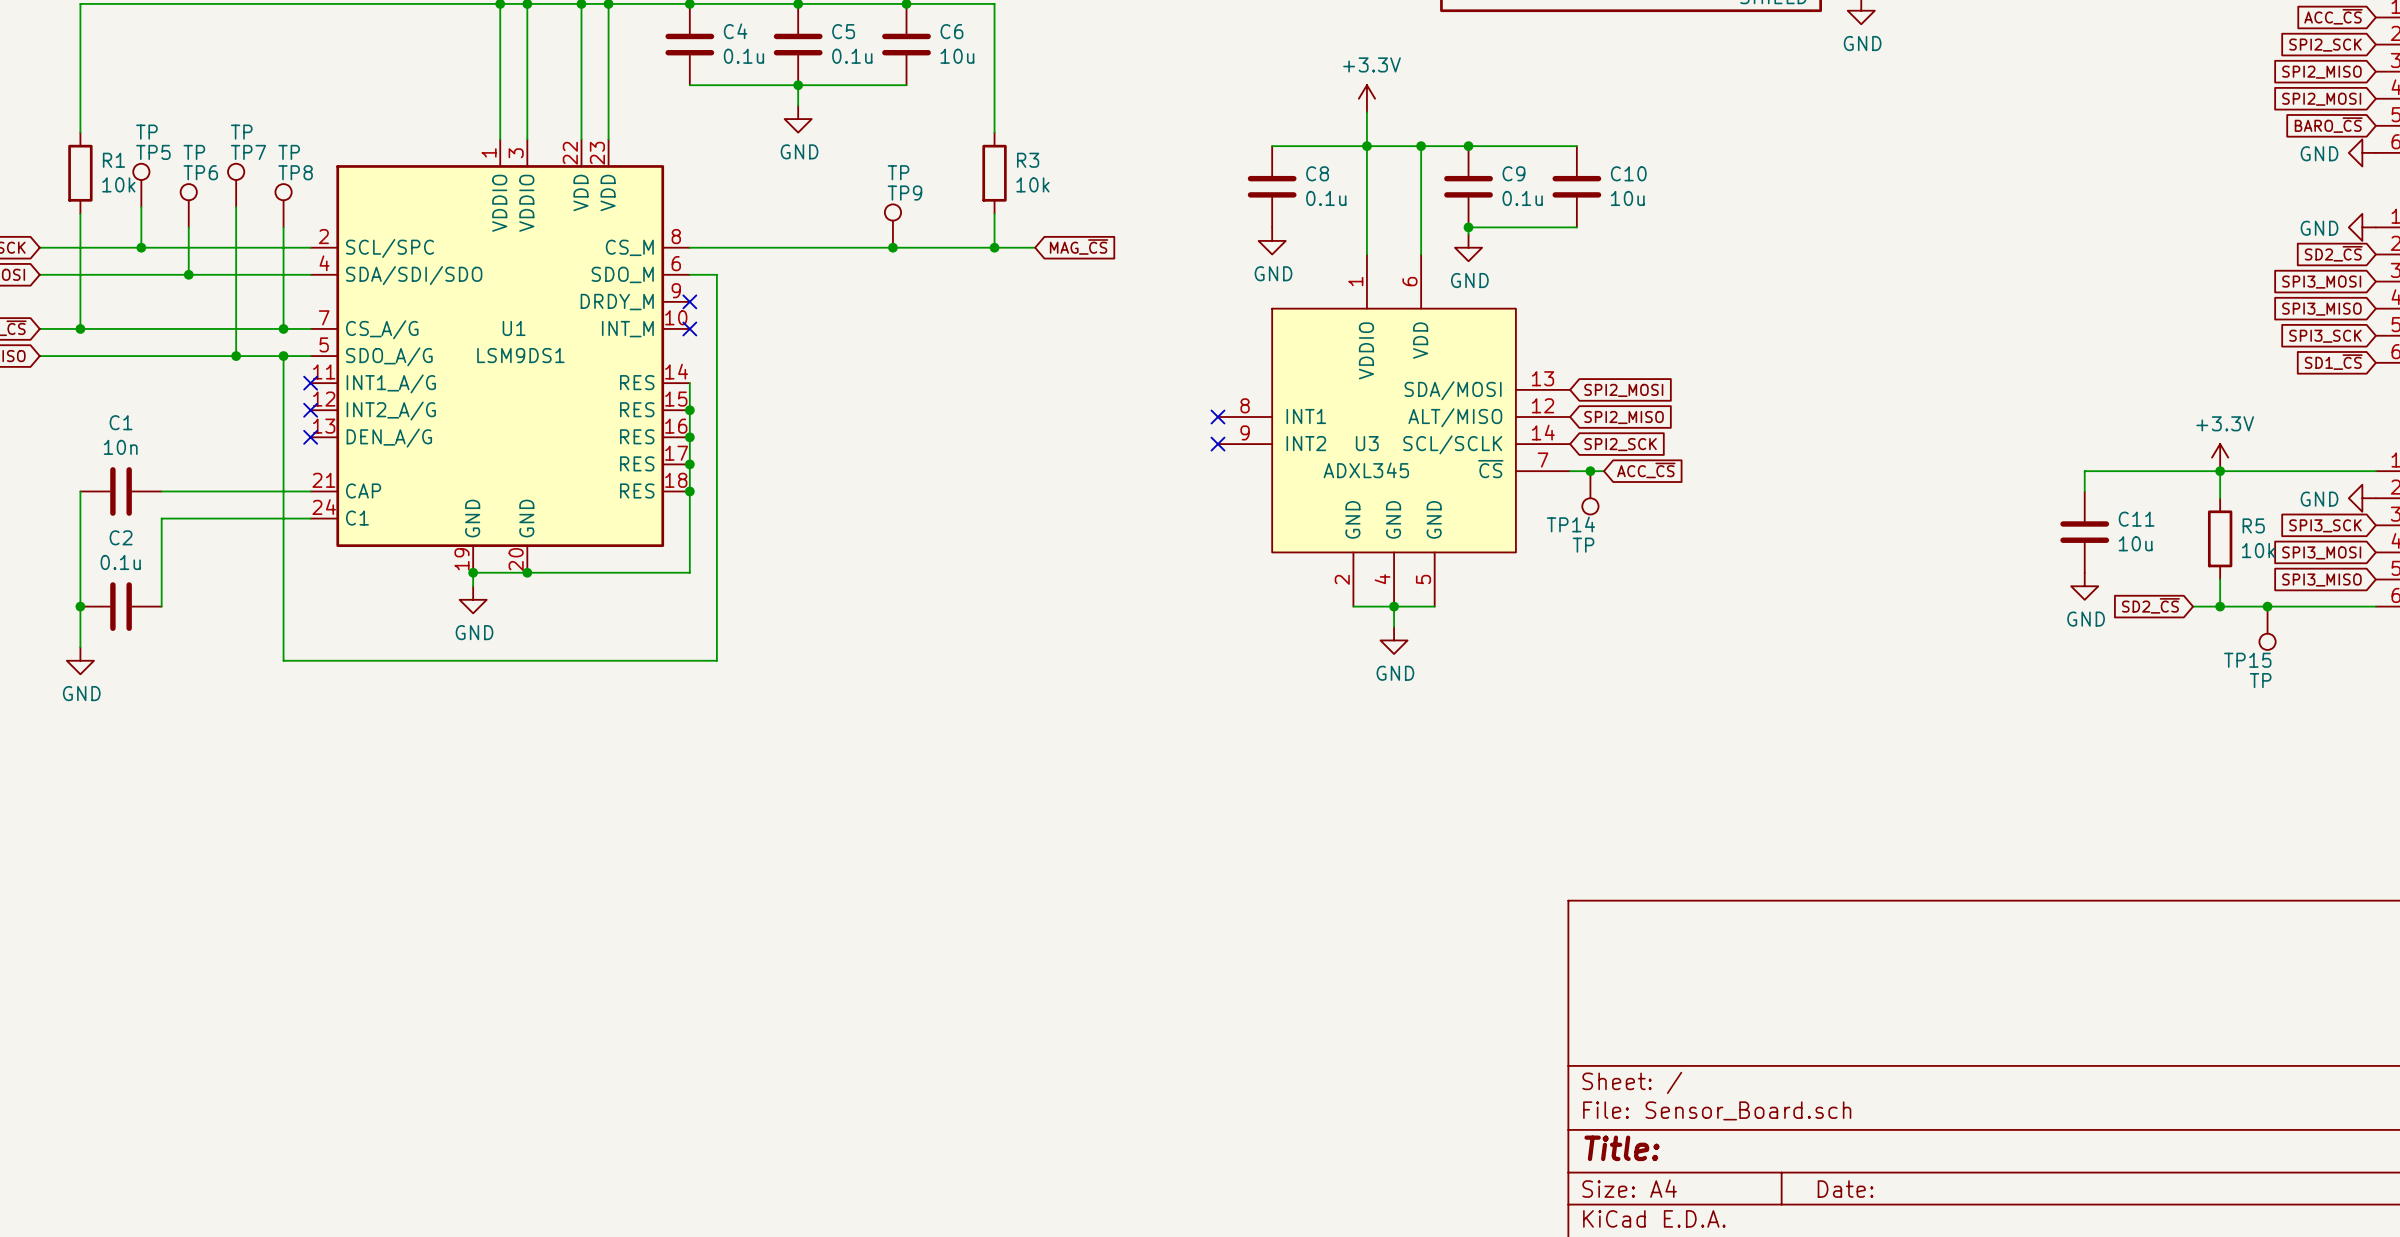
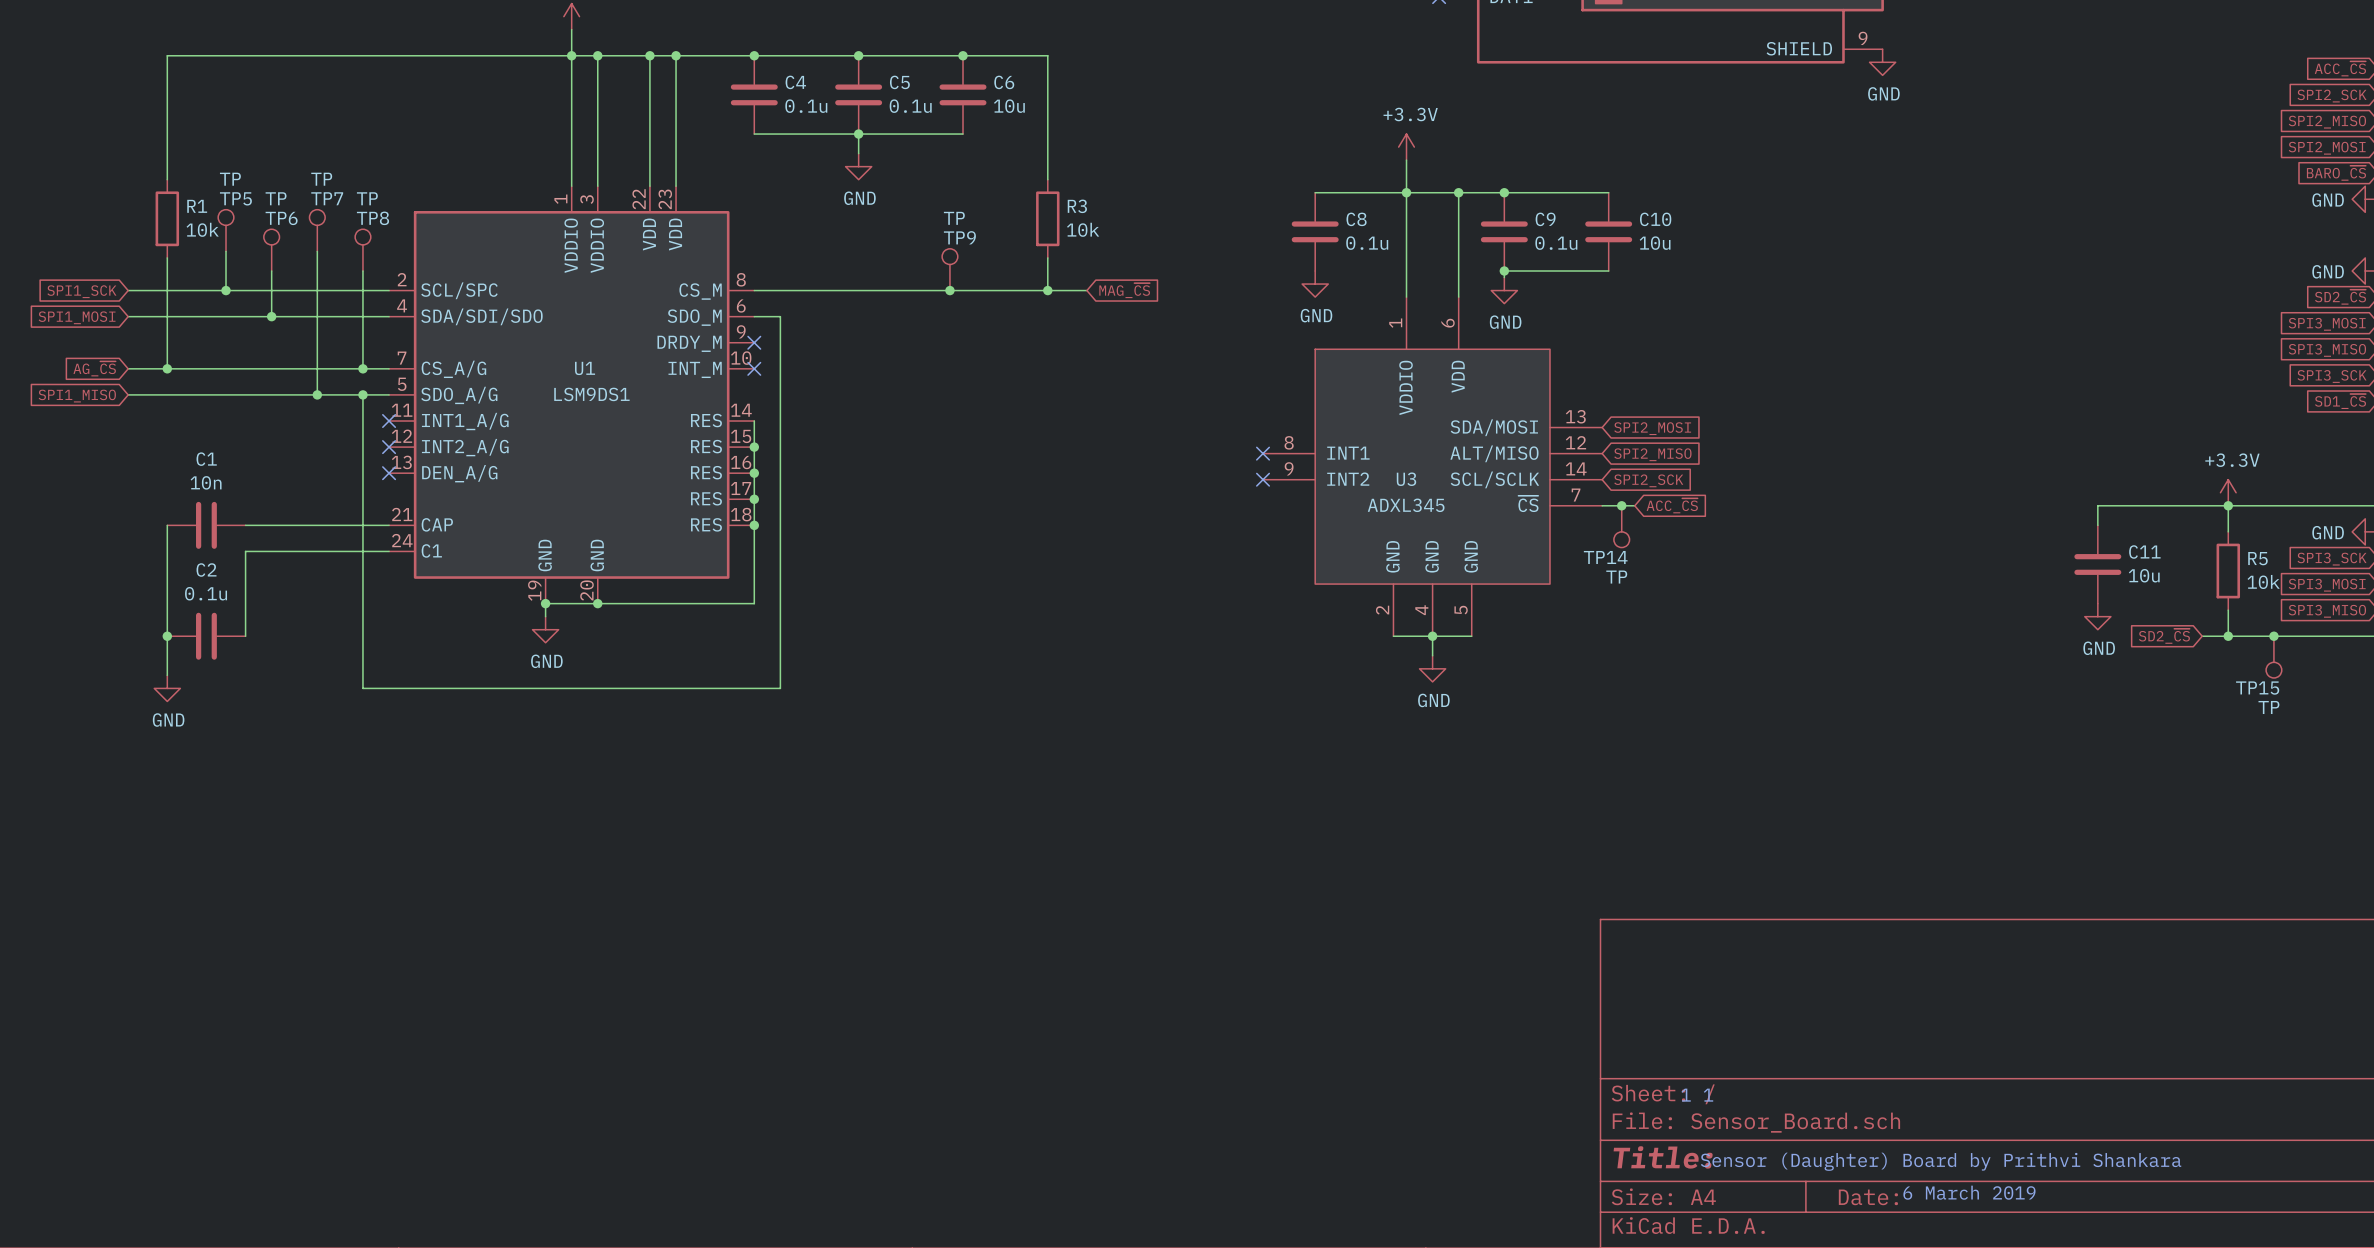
text: none -> 1 1 (1697, 1095)
text: none -> Sensor (Daughter) Board by Prithvi Shankara (1941, 1161)
text: none -> 6 March 2019 (1969, 1192)

